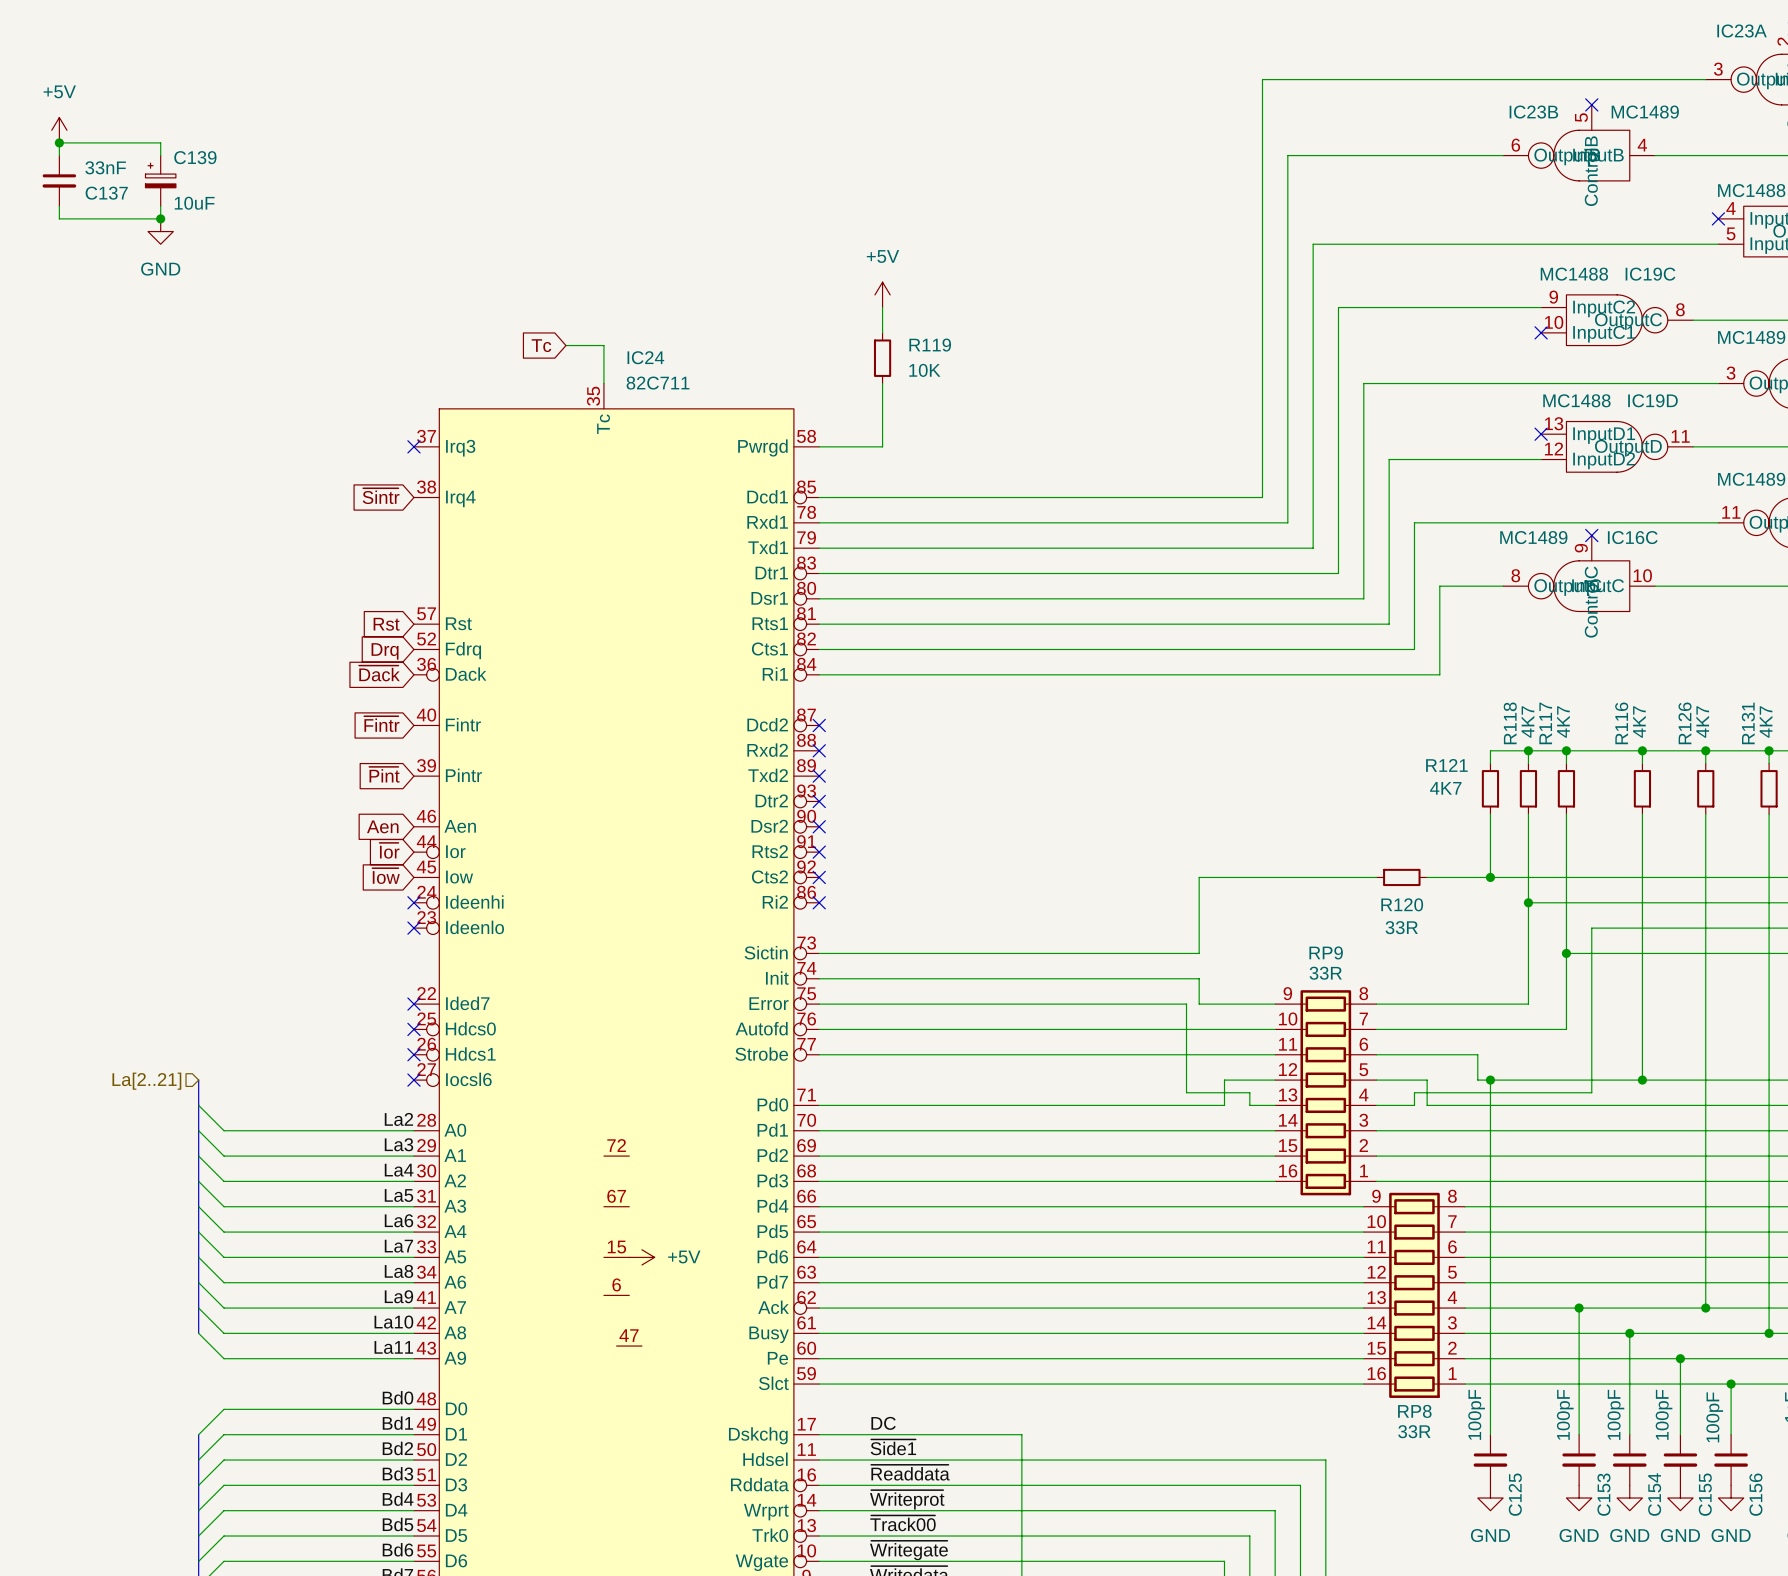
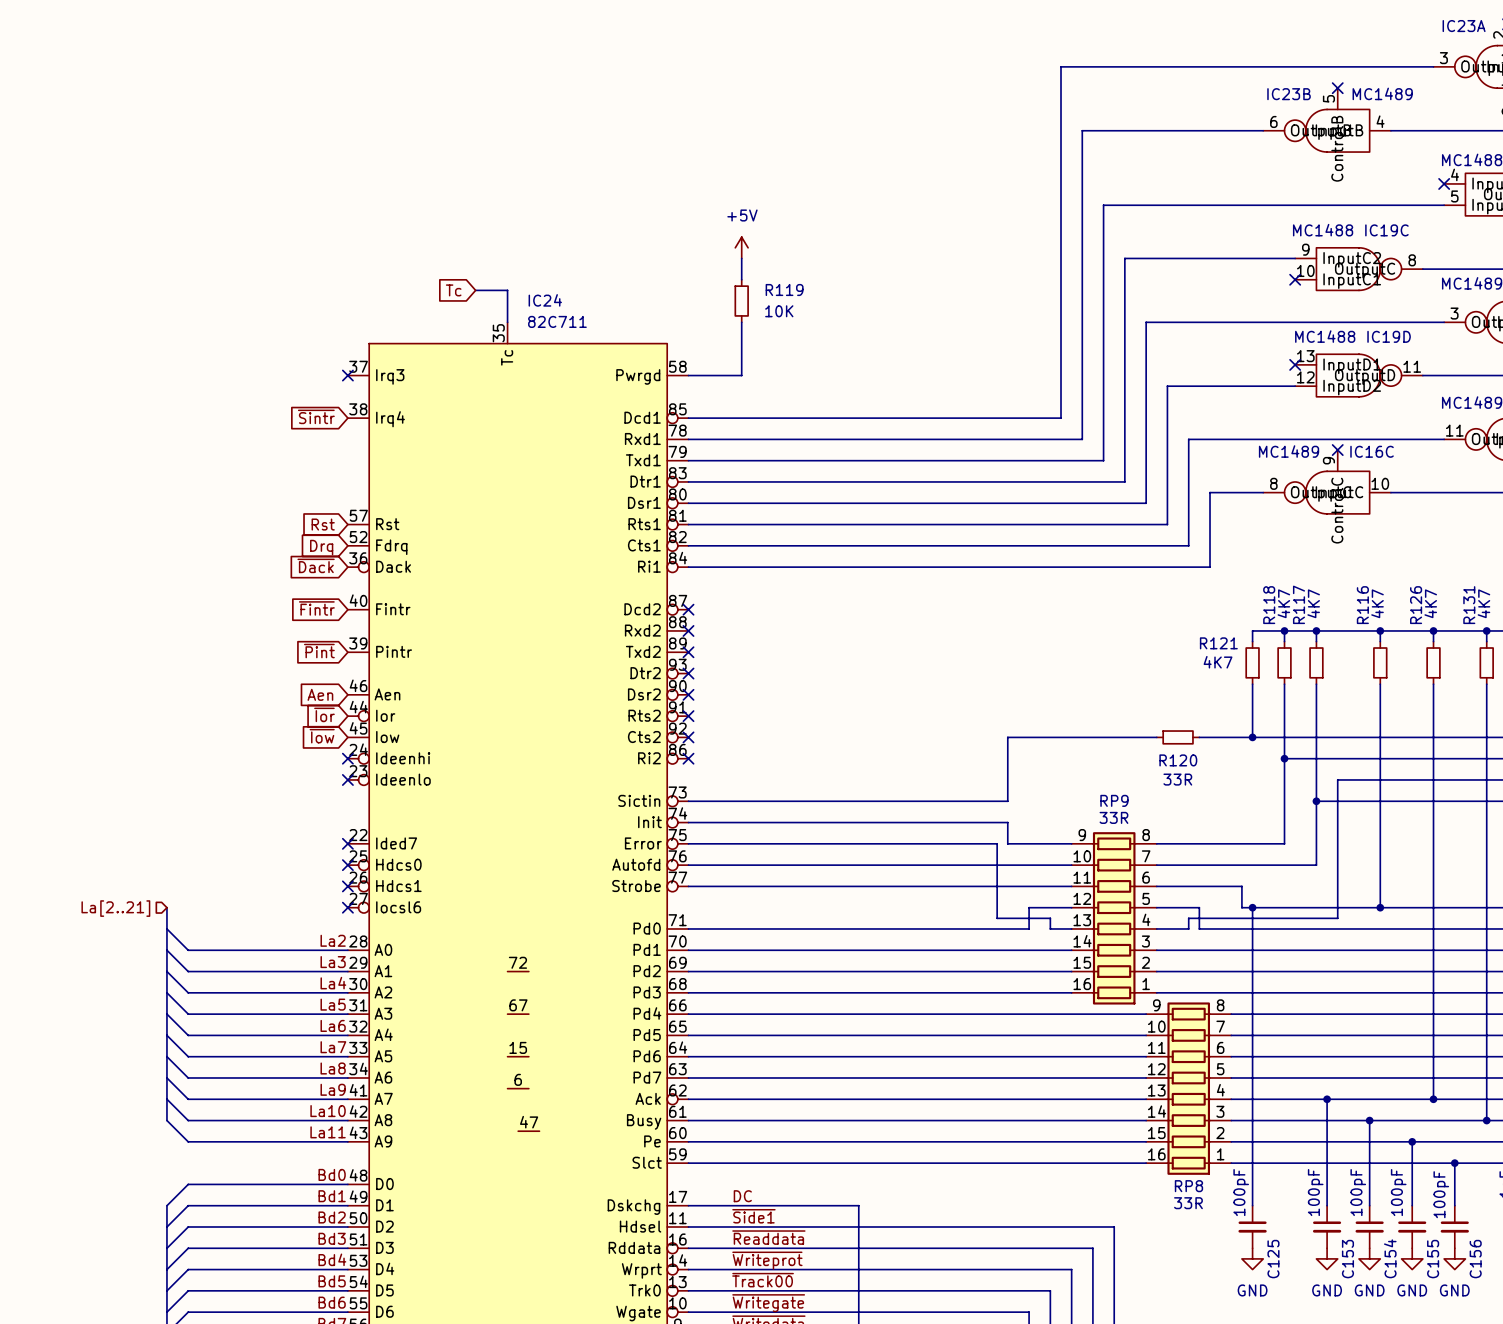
power symbol: +5V (59, 130) -> none
junction: (59, 142) -> none
wire: (59, 155) (59, 142) (160, 142) (160, 155) -> none
C137: 33nF (59, 180) -> none
C139: 10uF (160, 180) -> none
wire: (59, 206) (59, 218) (160, 218) (160, 206) -> none
junction: (160, 218) -> none
power symbol: GND (160, 231) -> none
power symbol: +5V (641, 1257) -> none

